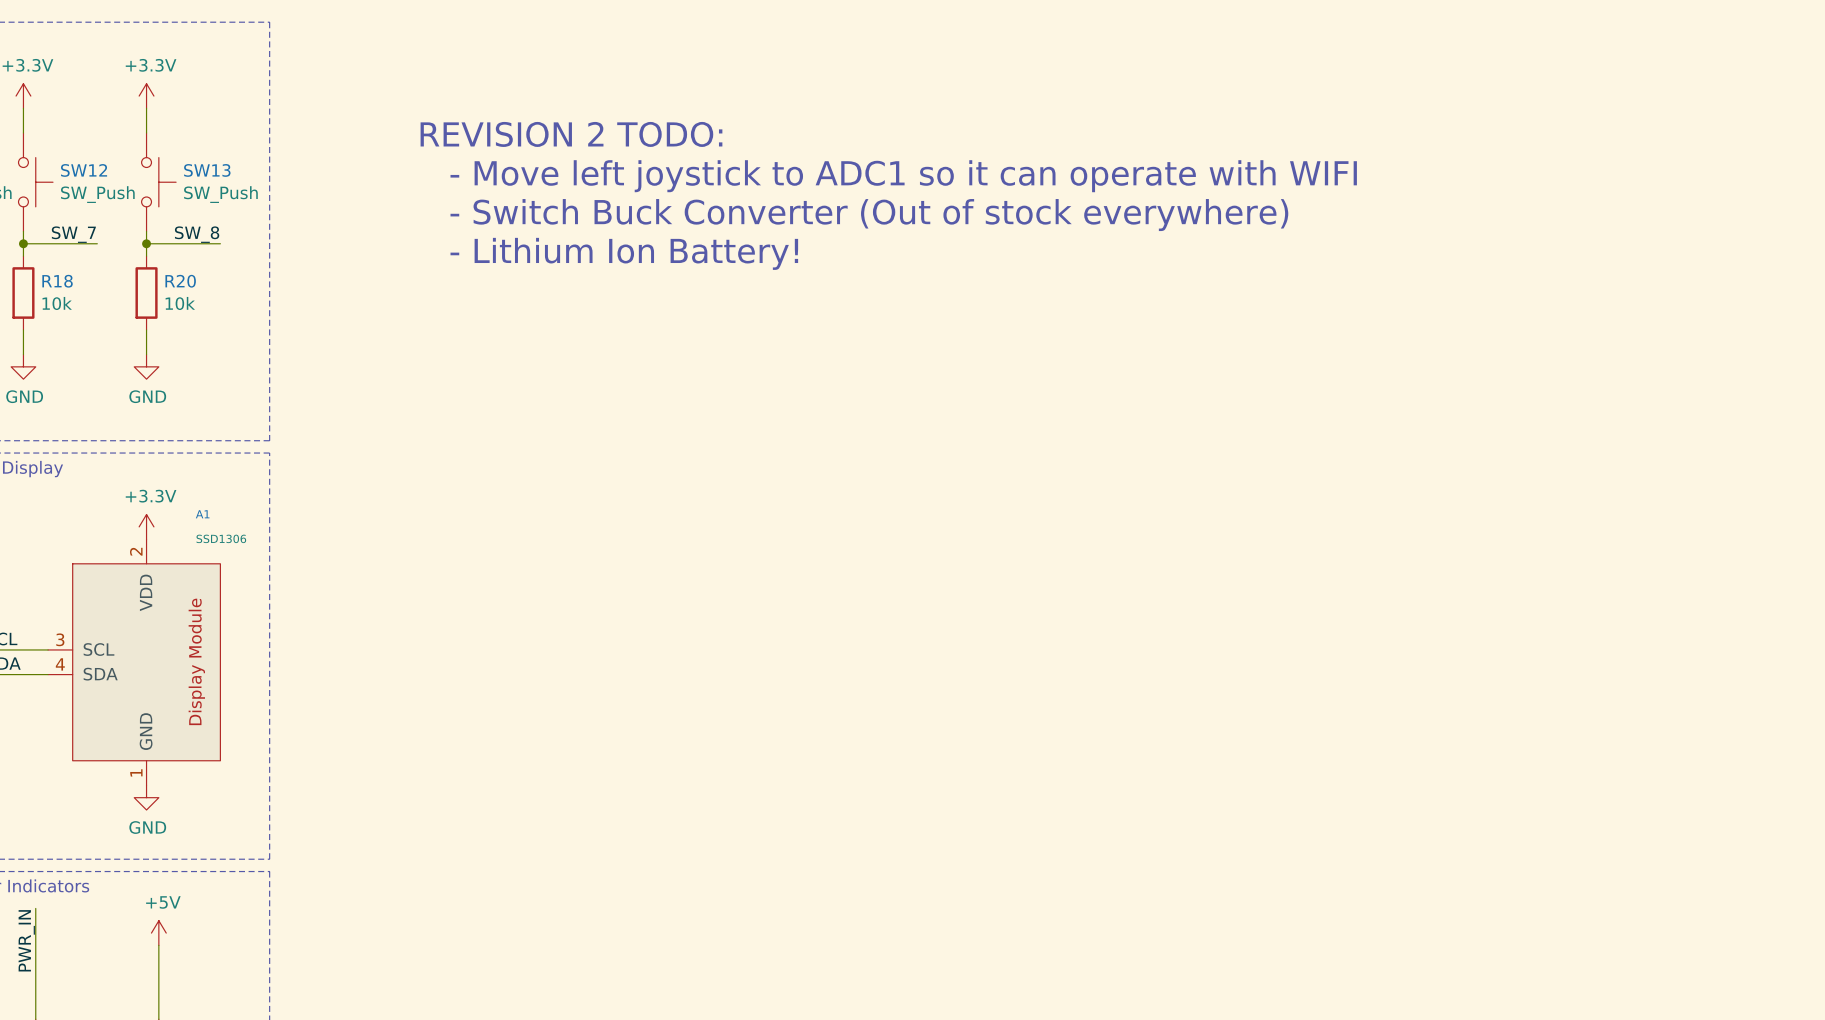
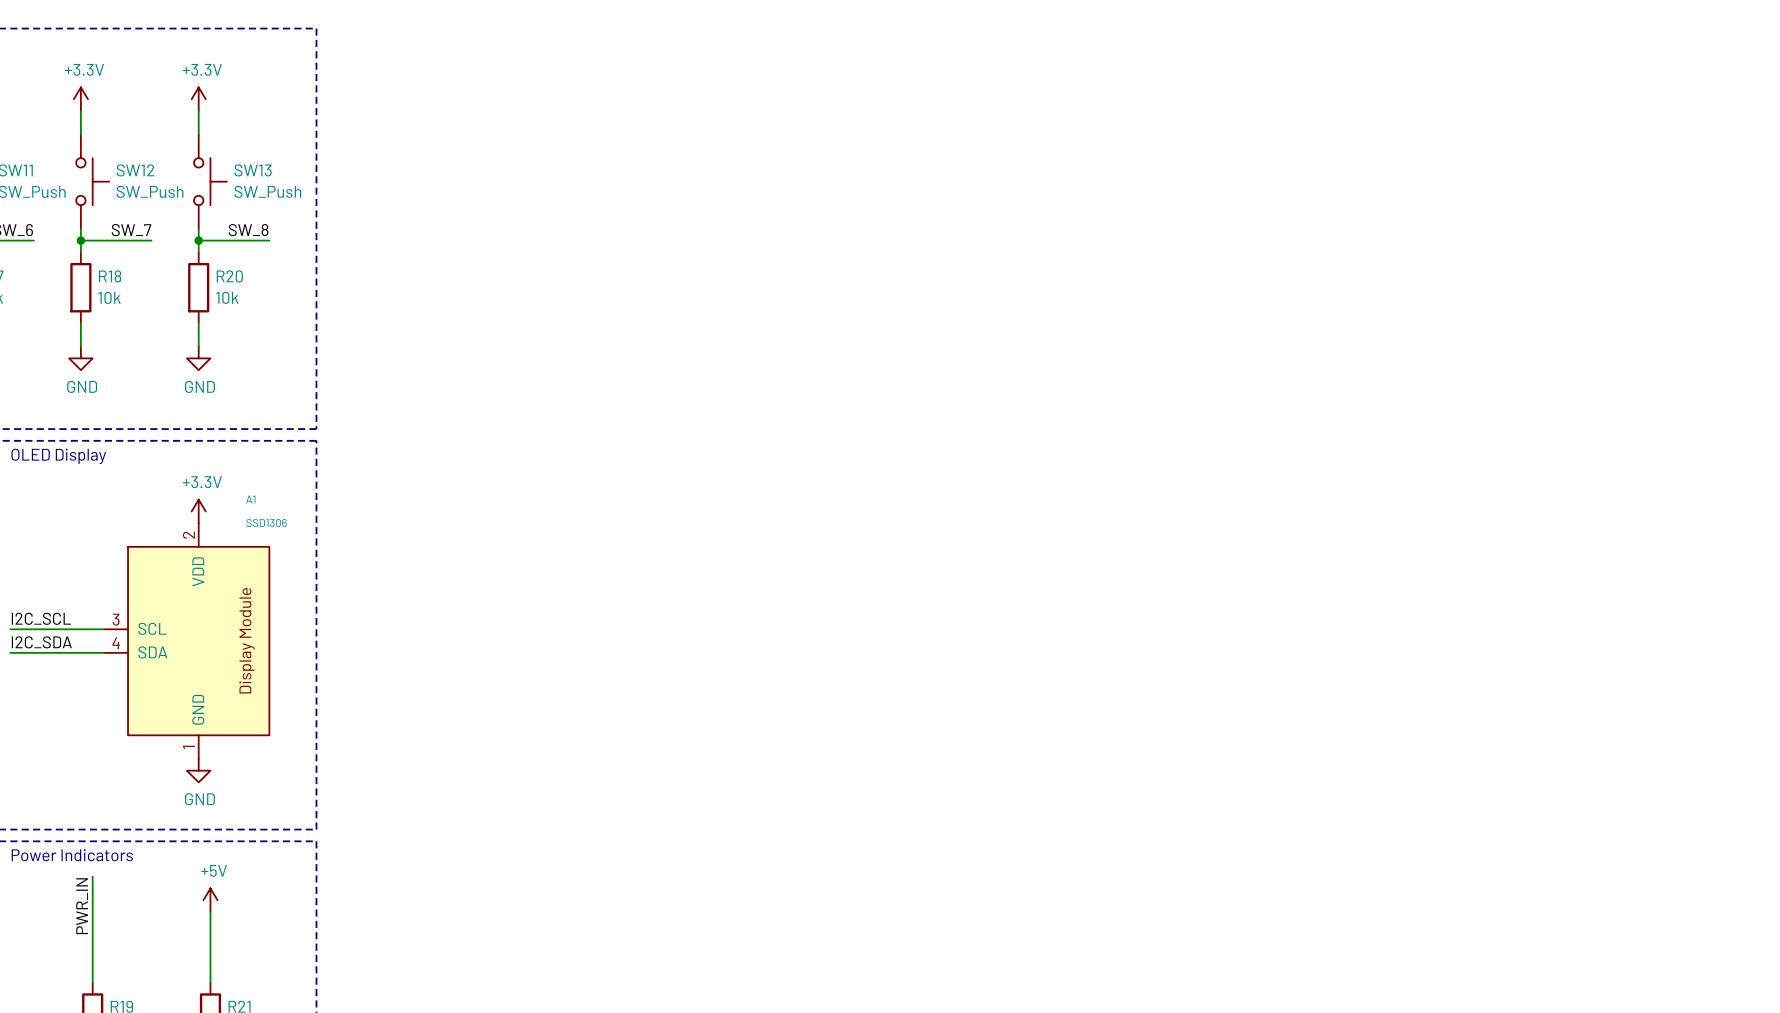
text: REVISION 2 TODO: (571, 134) -> none
text: - Move left joystick to ADC1 so it can operate with WIFI (903, 176) -> none
text: - Switch Buck Converter (Out of stock everywhere) (869, 215) -> none
text: - Lithium Ion Battery! (624, 253) -> none

